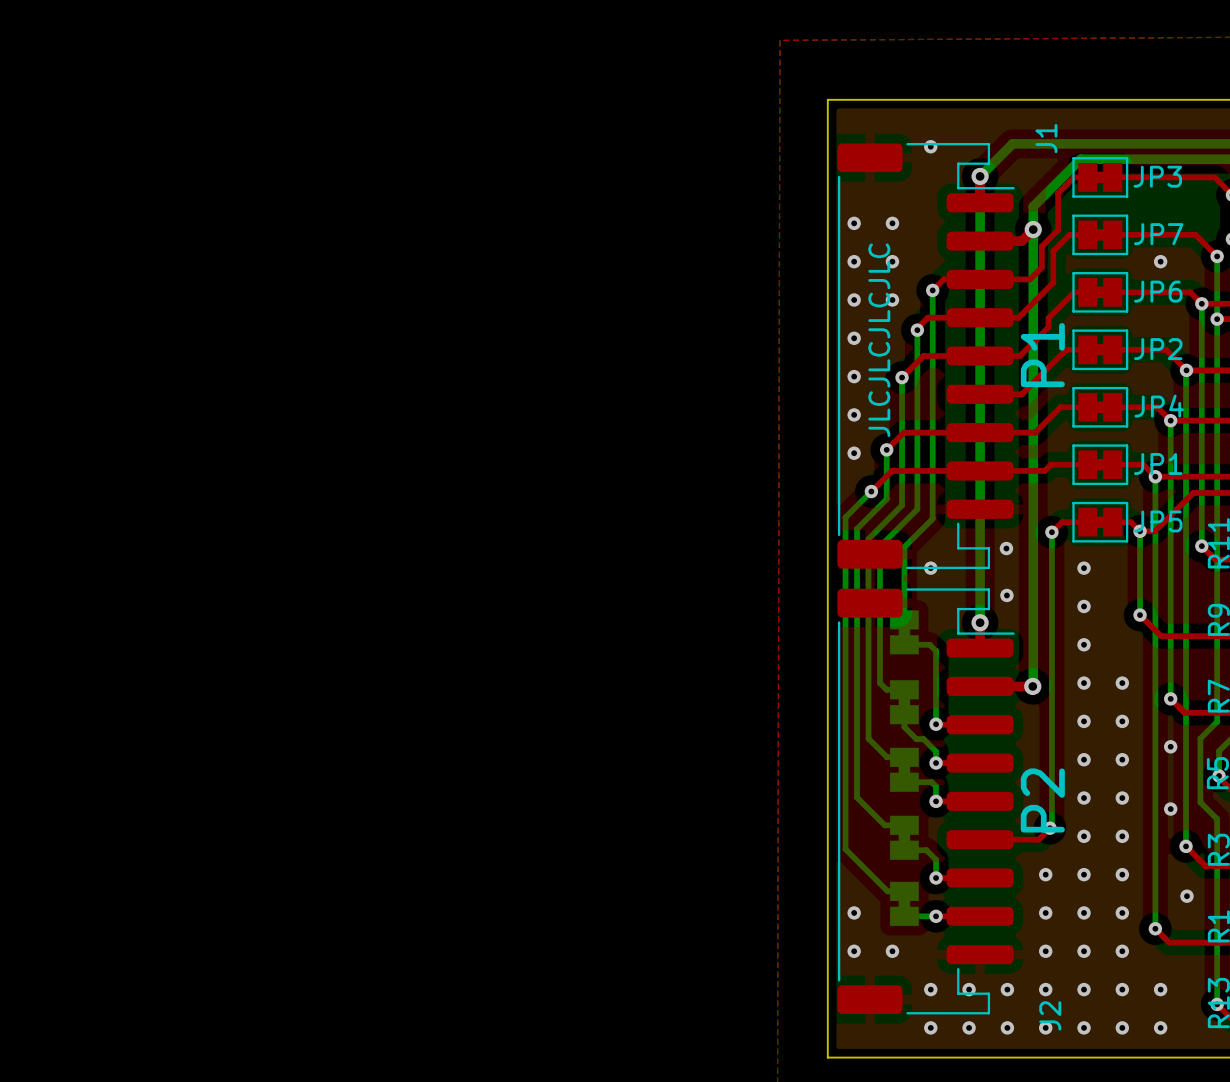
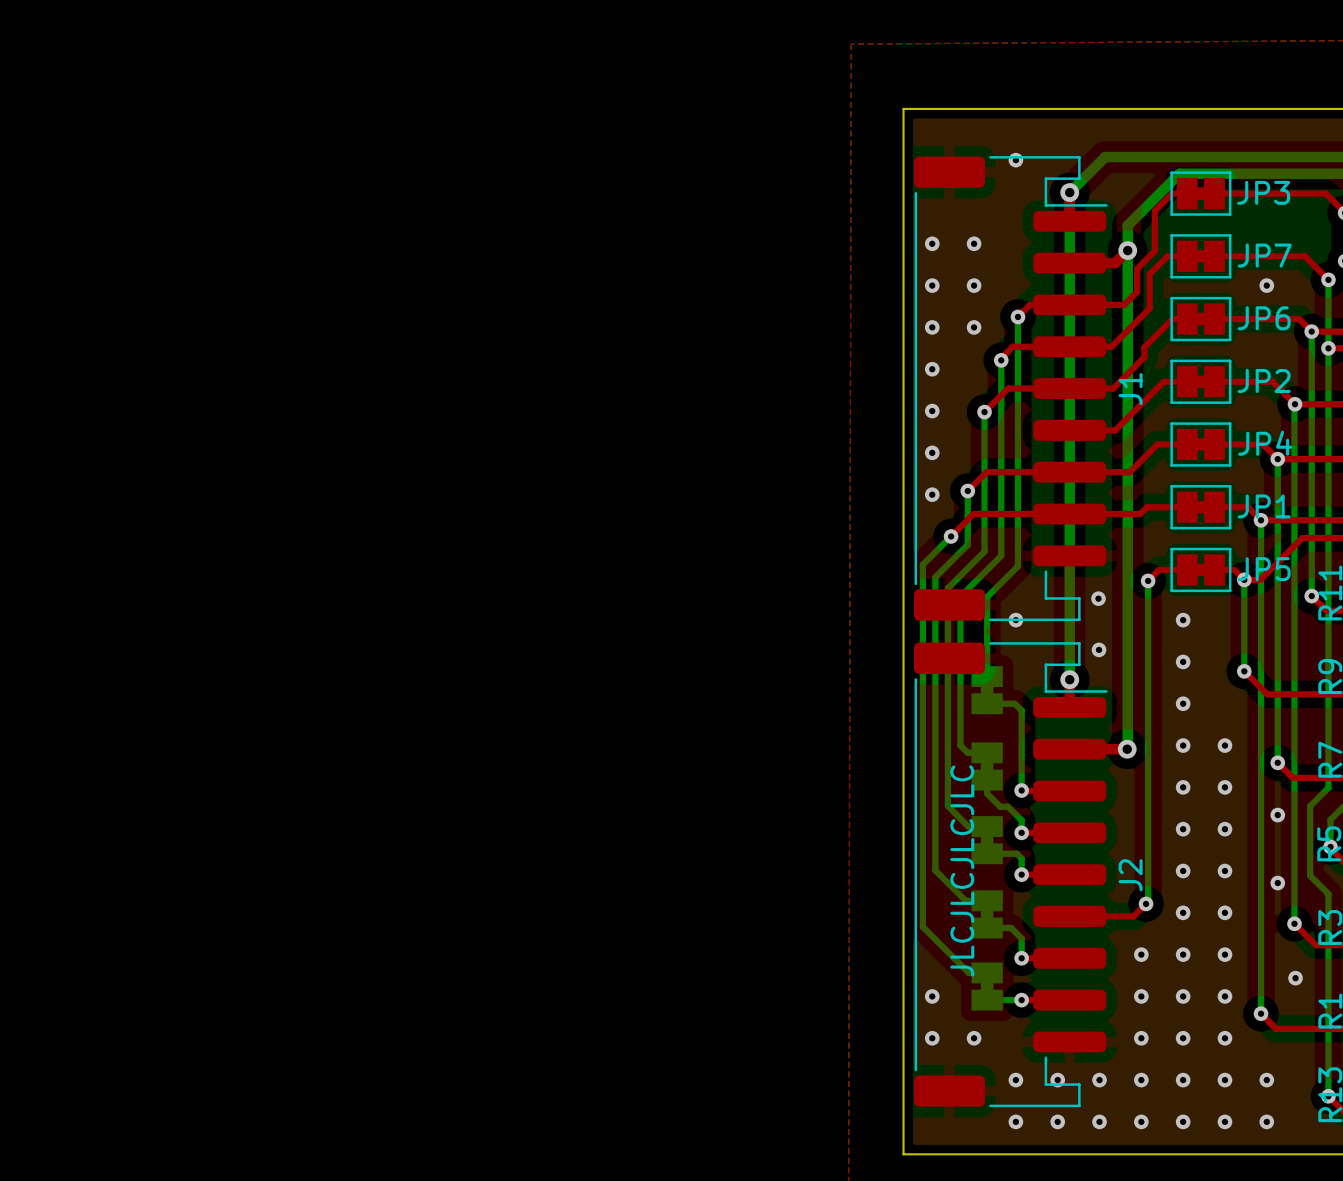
J1 name position: J1 (1046, 138) -> J1 (1130, 389)
text position: JLCJLCJLCJLC (879, 340) -> JLCJLCJLCJLC (962, 870)
text: P1 (1042, 355) -> none
text: P2 (1042, 800) -> none
J2 name position: J2 (1050, 1015) -> J2 (1130, 875)

